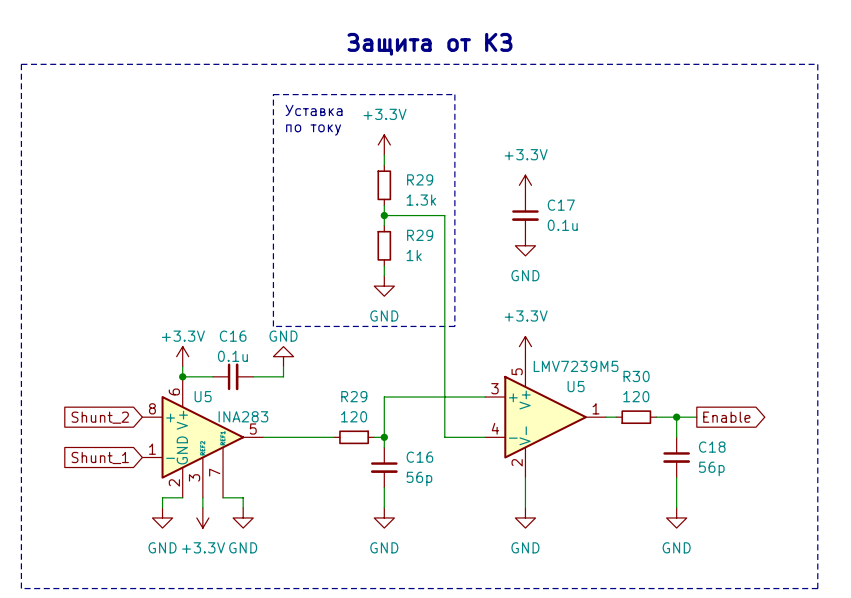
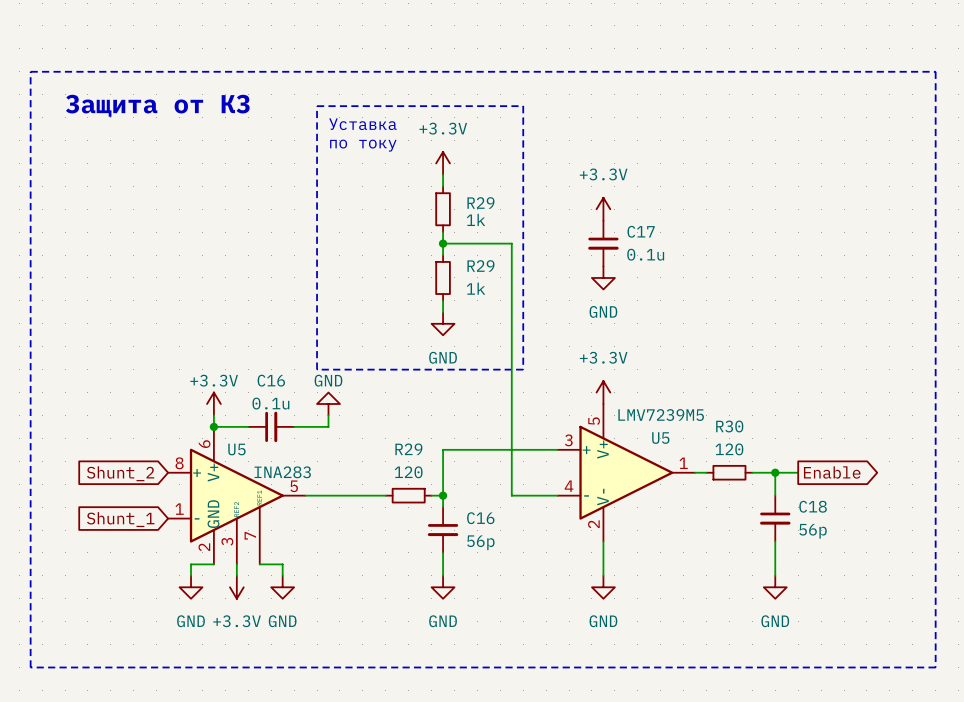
text: Защита от КЗ (429, 44) -> none
text: none -> Защита от КЗ (157, 105)
R29 value: 1.3k (421, 200) -> 1k (476, 219)

